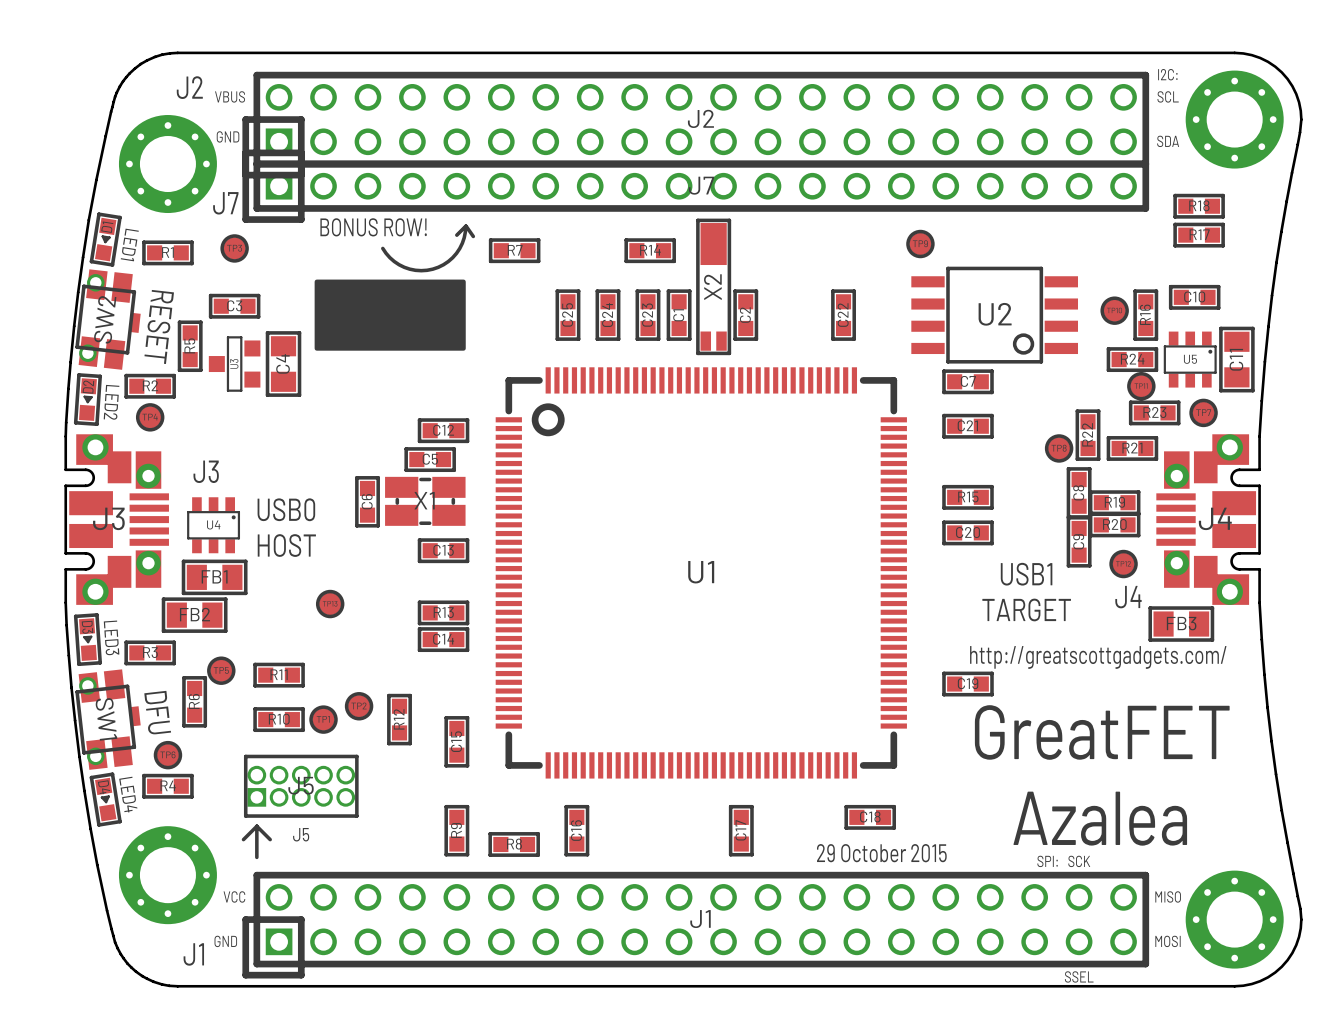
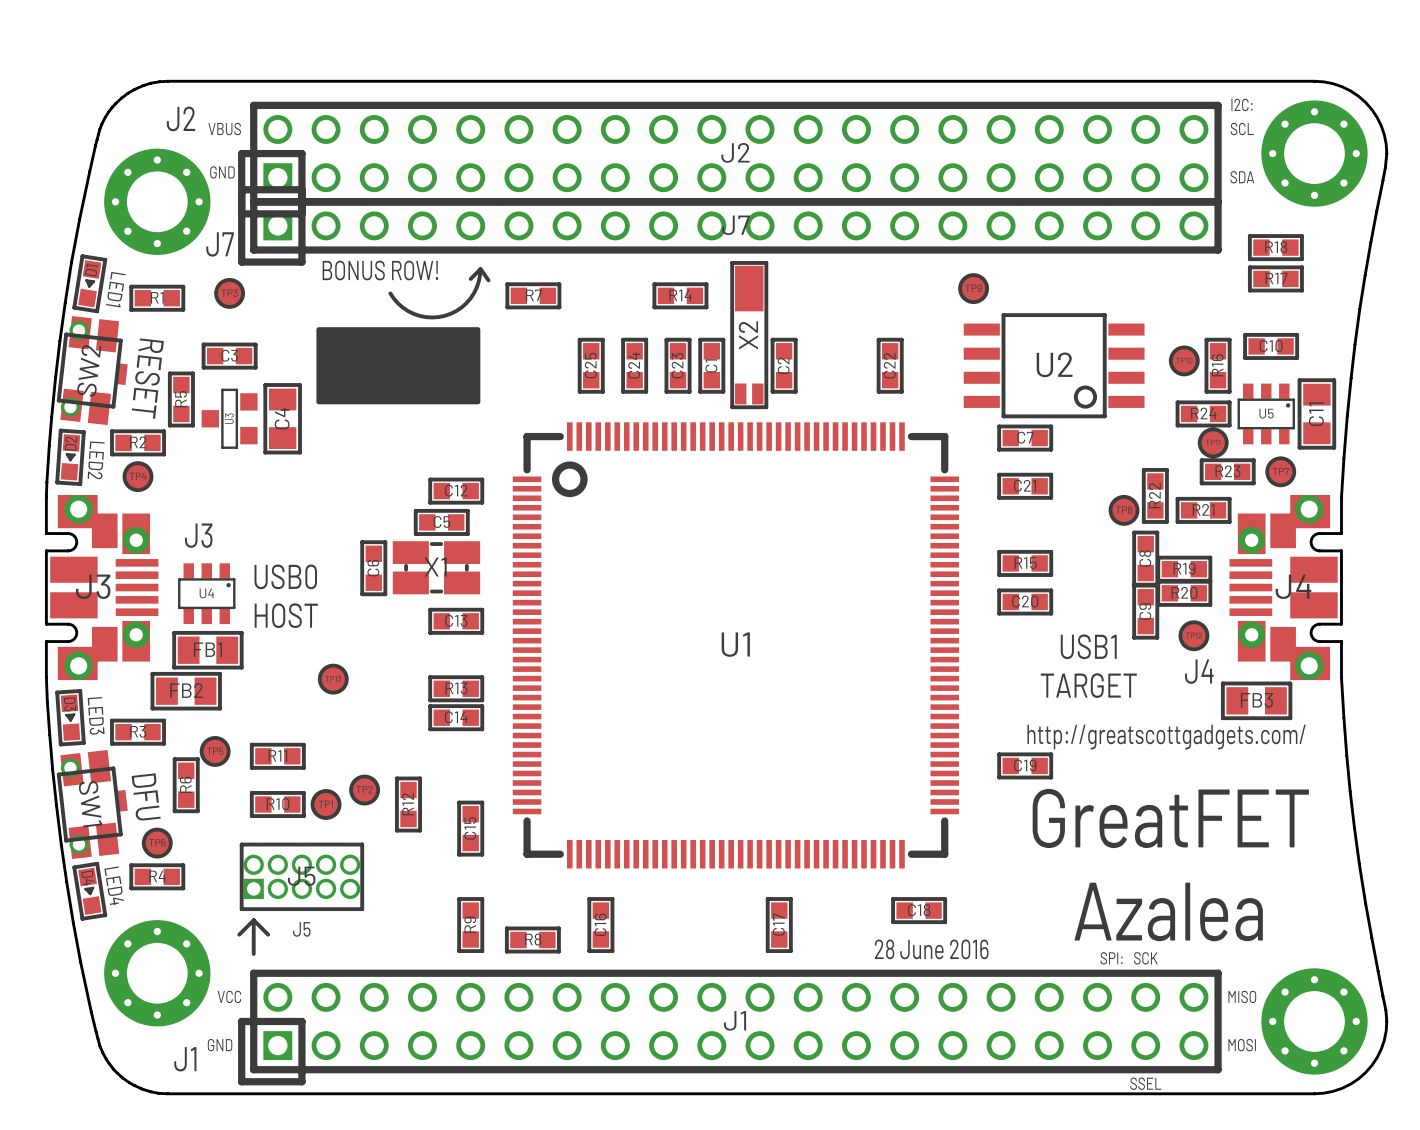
text: 29 October 2015 (881, 853) -> 28 June 2016 (931, 949)

